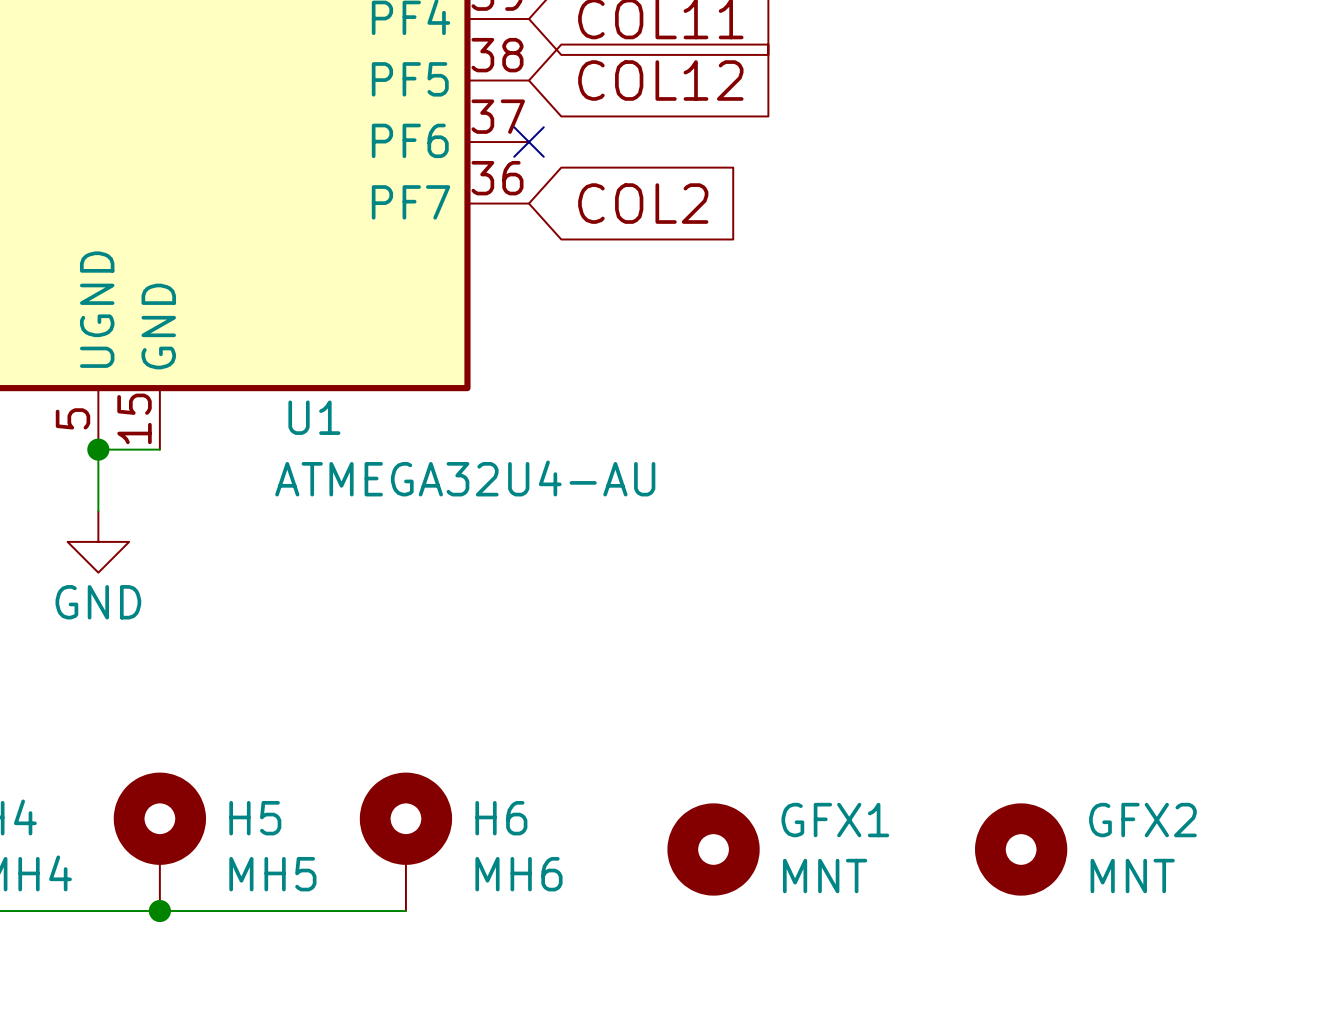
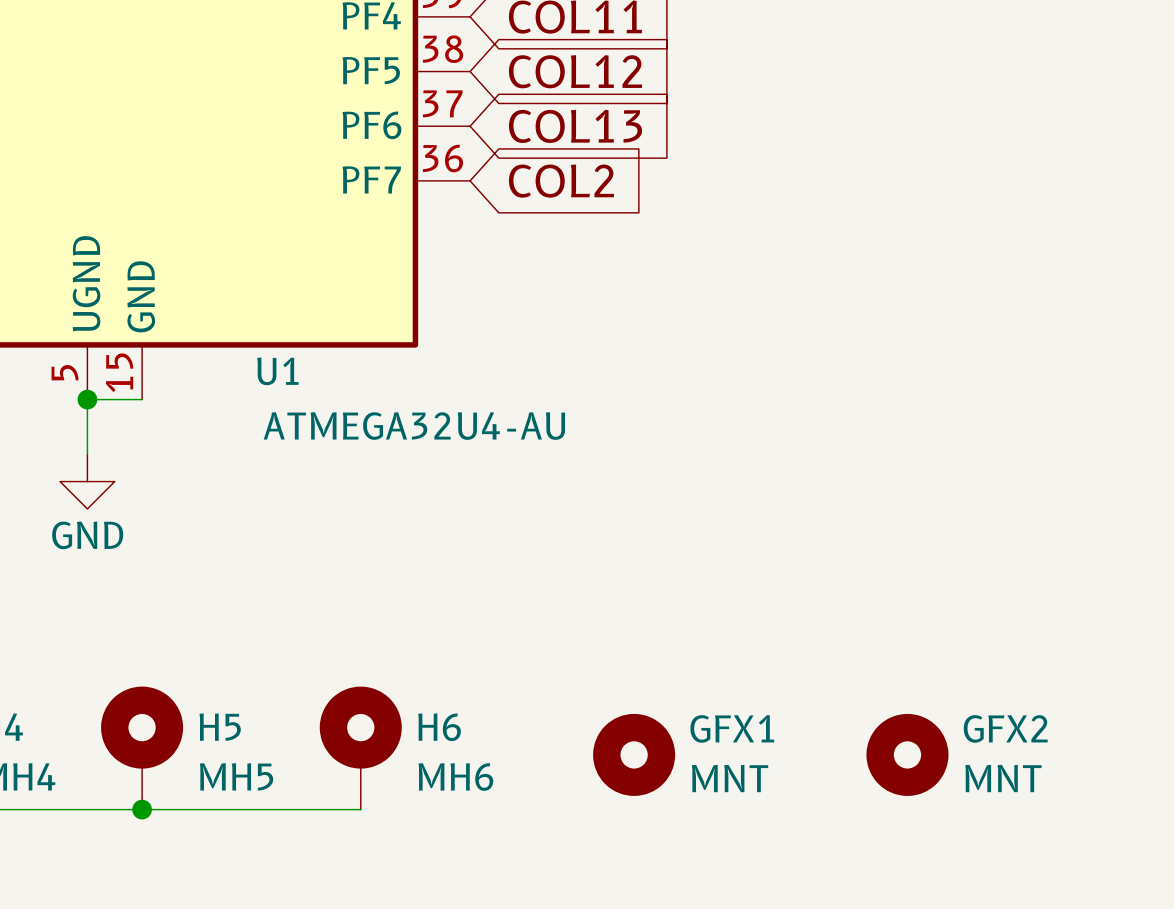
no-connect mark: (528, 142) -> none
global label: none -> COL13 (575, 126)

